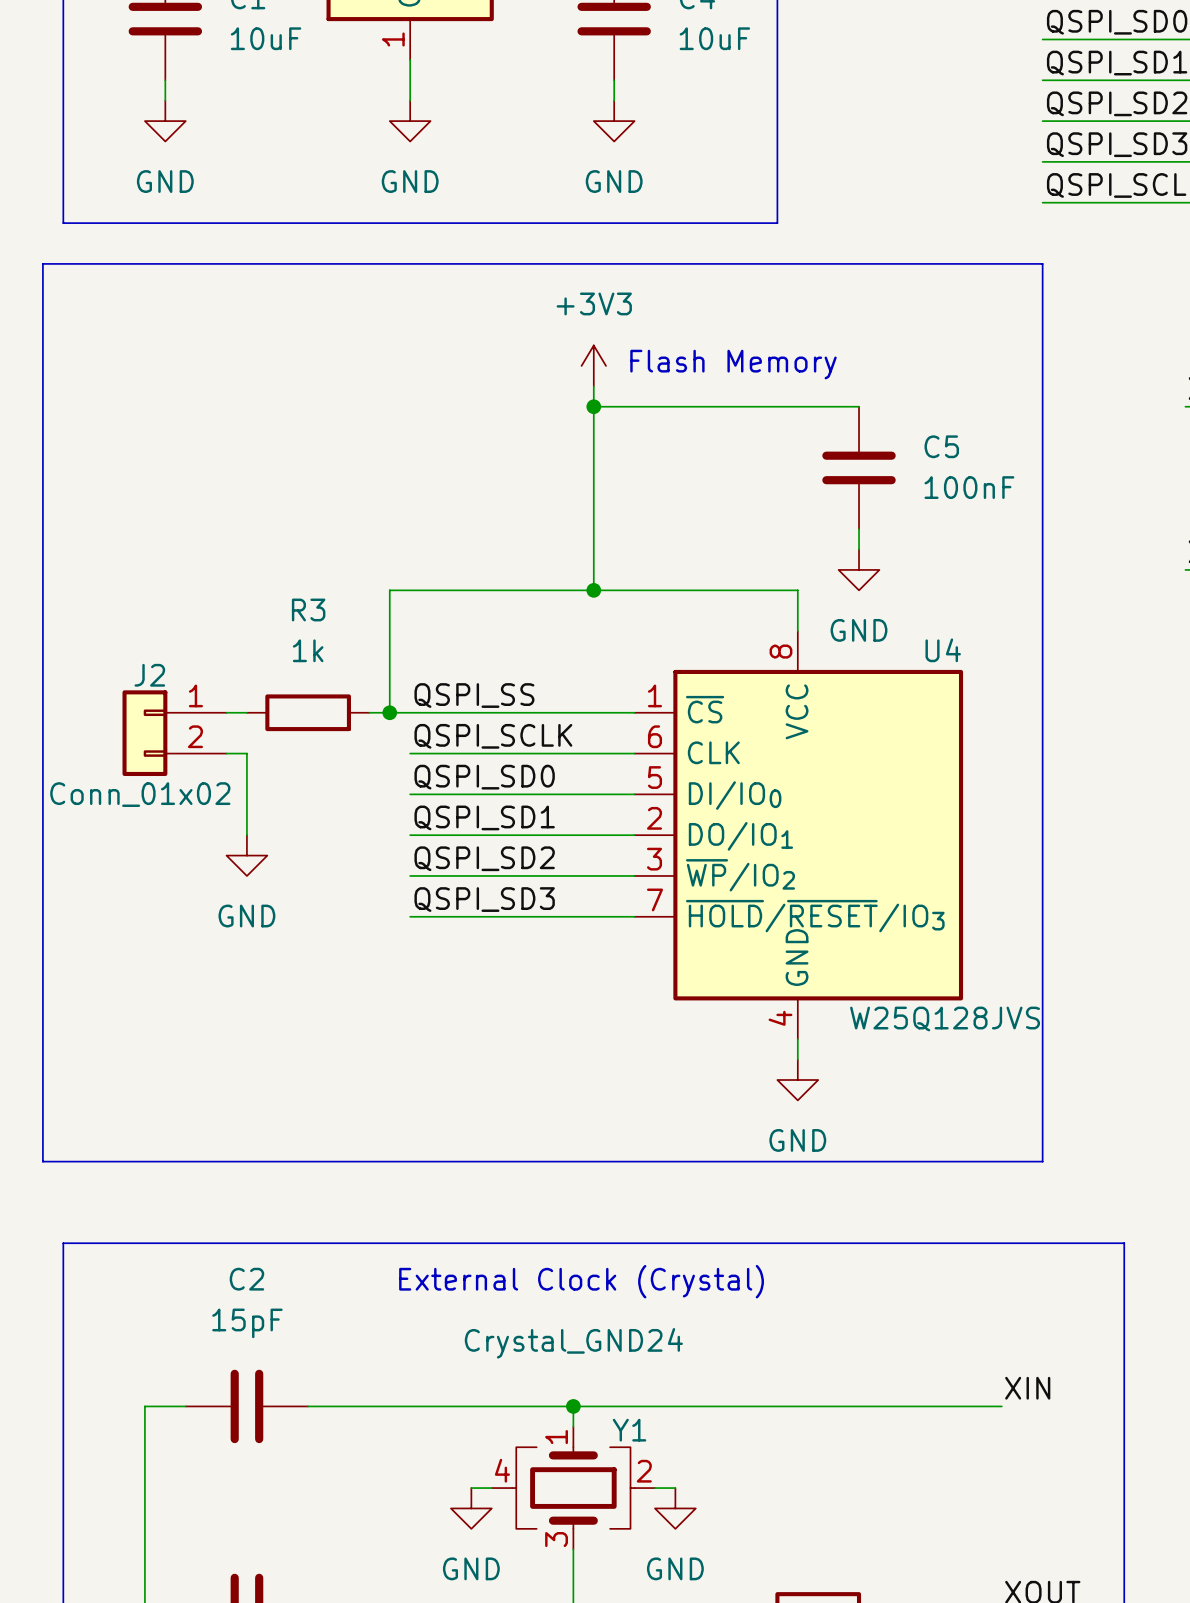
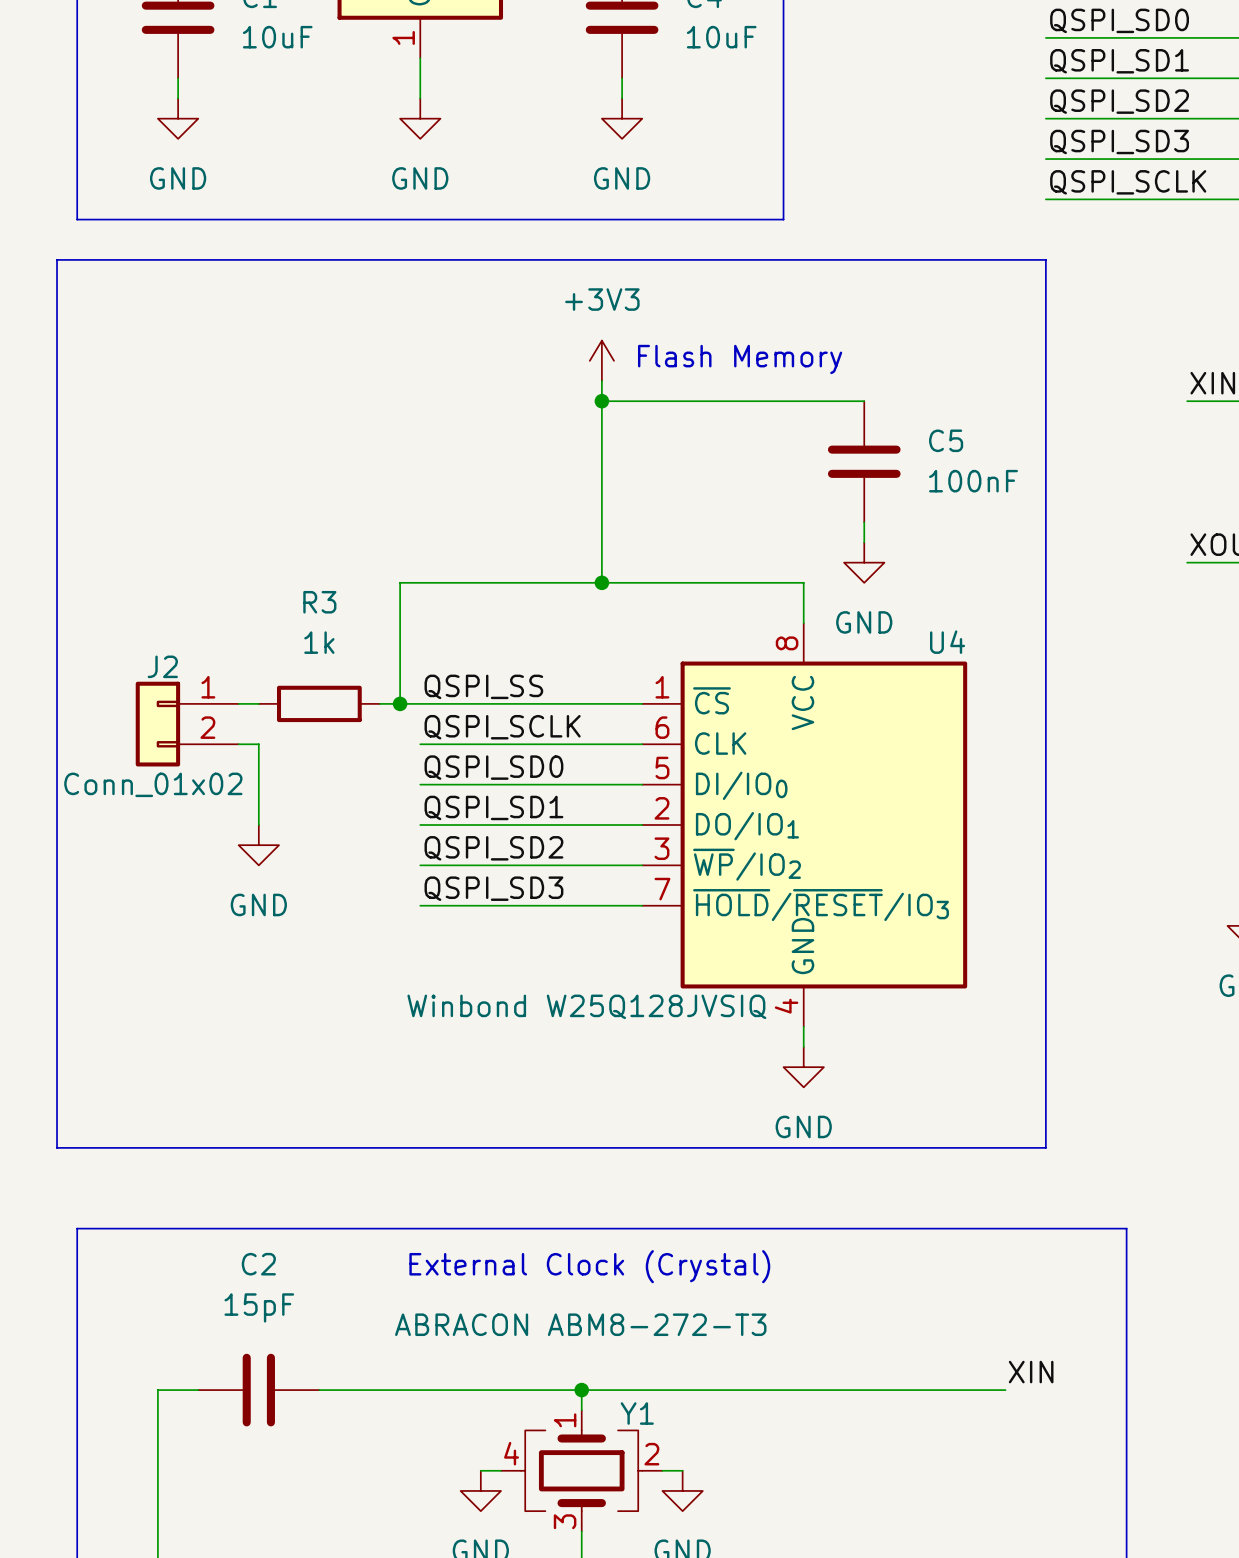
U4 value: W25Q128JVS (945, 1019) -> Winbond W25Q128JVSIQ (586, 1006)
Y1 value: Crystal_GND24 (573, 1343) -> ABRACON ABM8-272-T3 (580, 1324)

